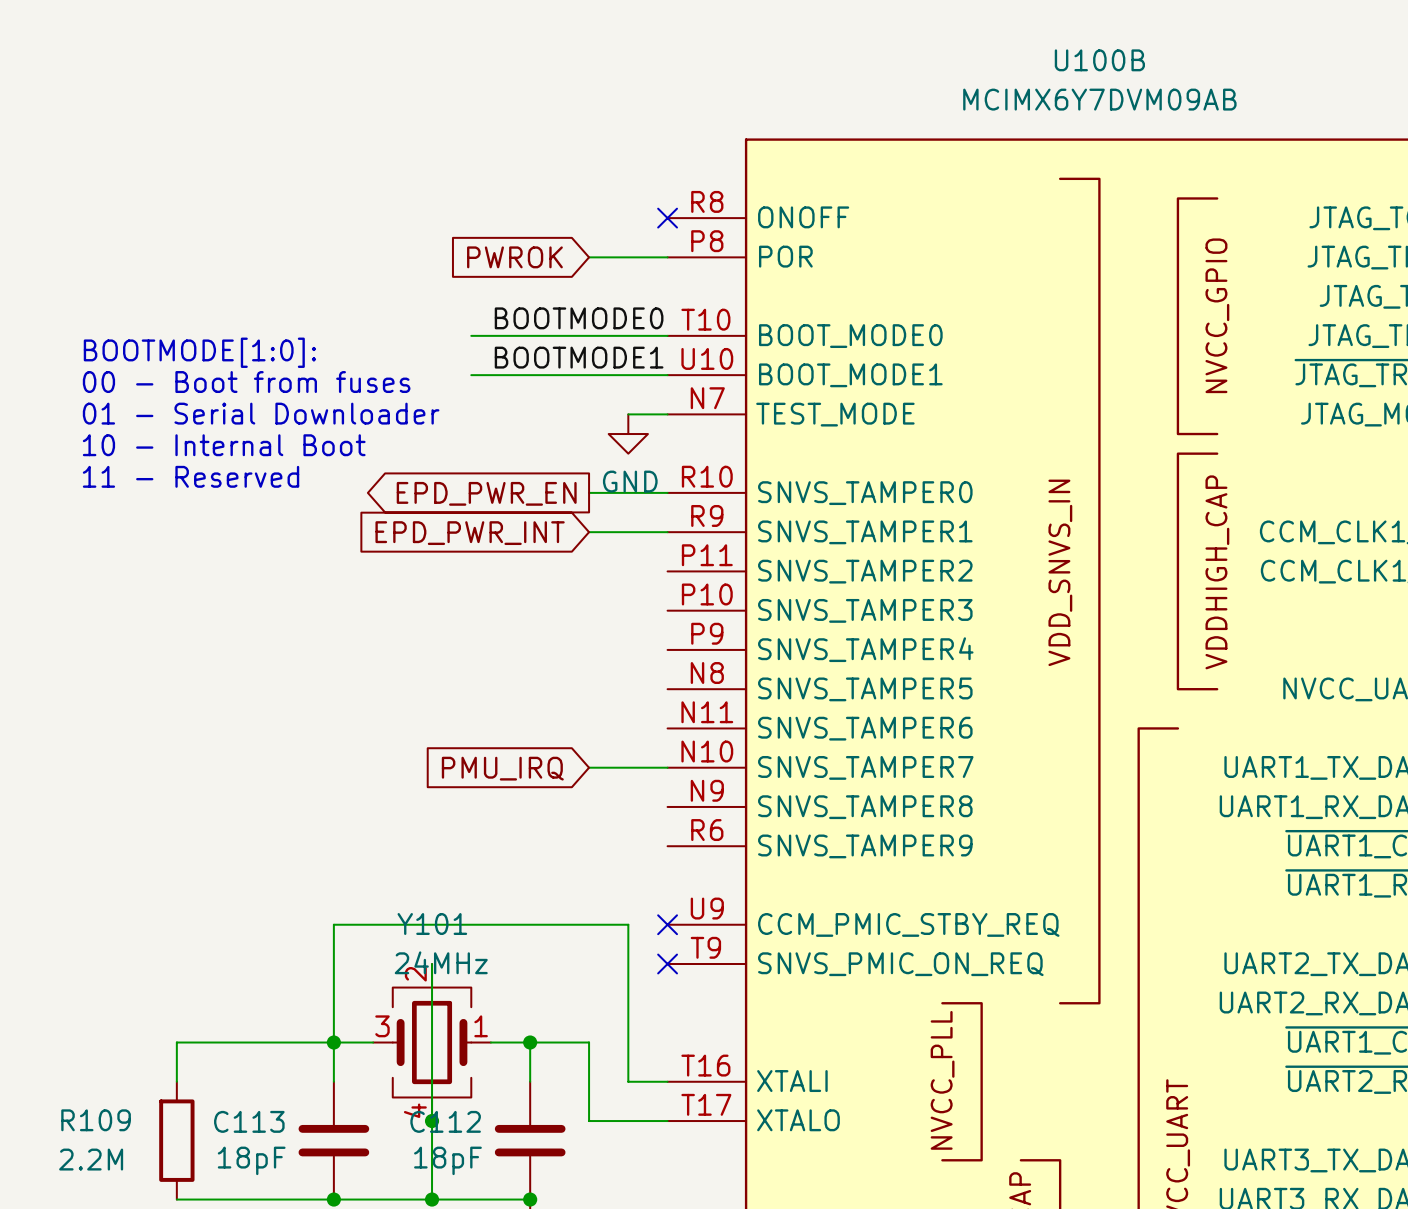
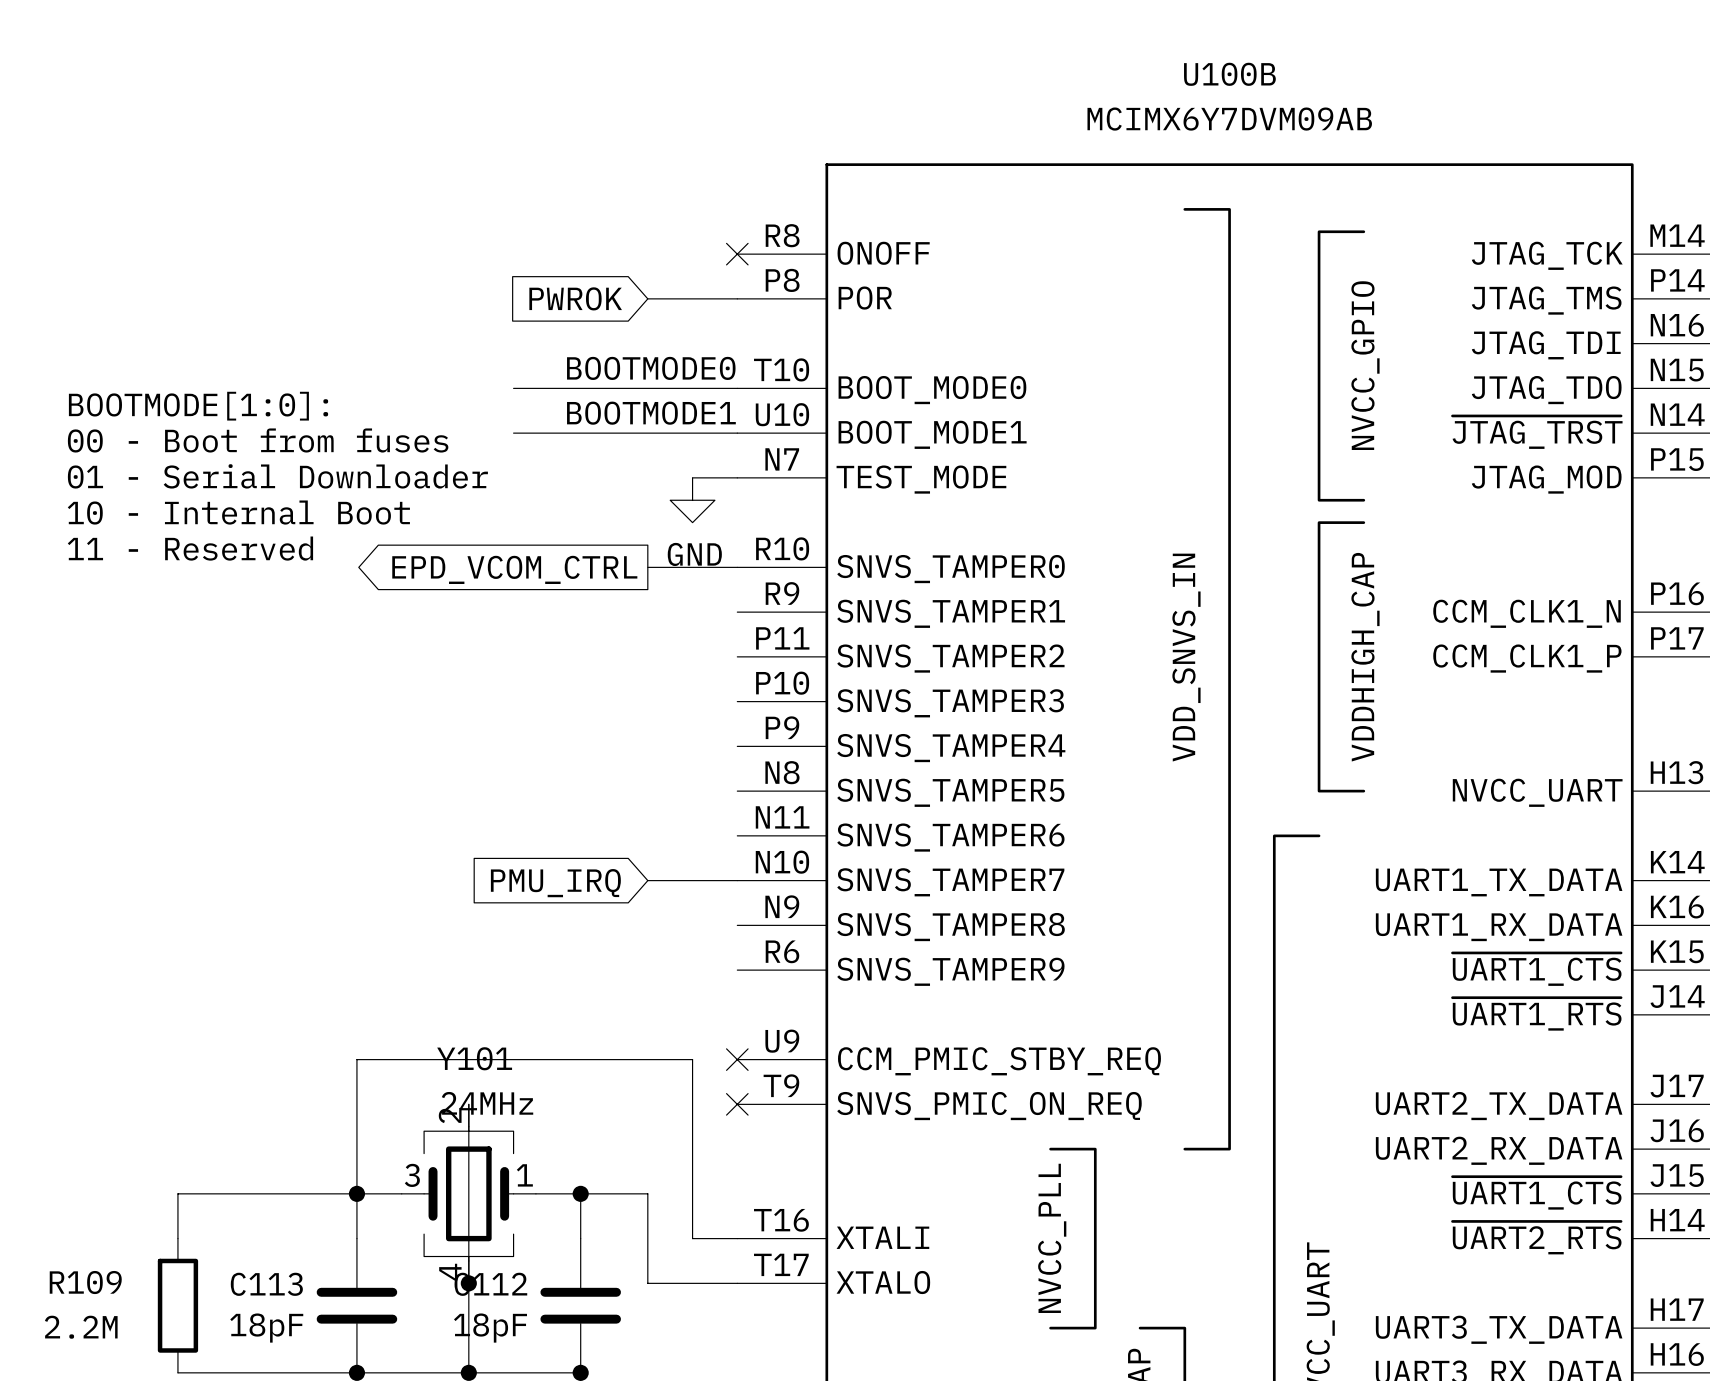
global label: EPD_PWR_EN (486, 493) -> EPD_VCOM_CTRL (514, 569)
wire: (589, 532) (667, 532) -> none
global label: EPD_PWR_INT (470, 533) -> none

